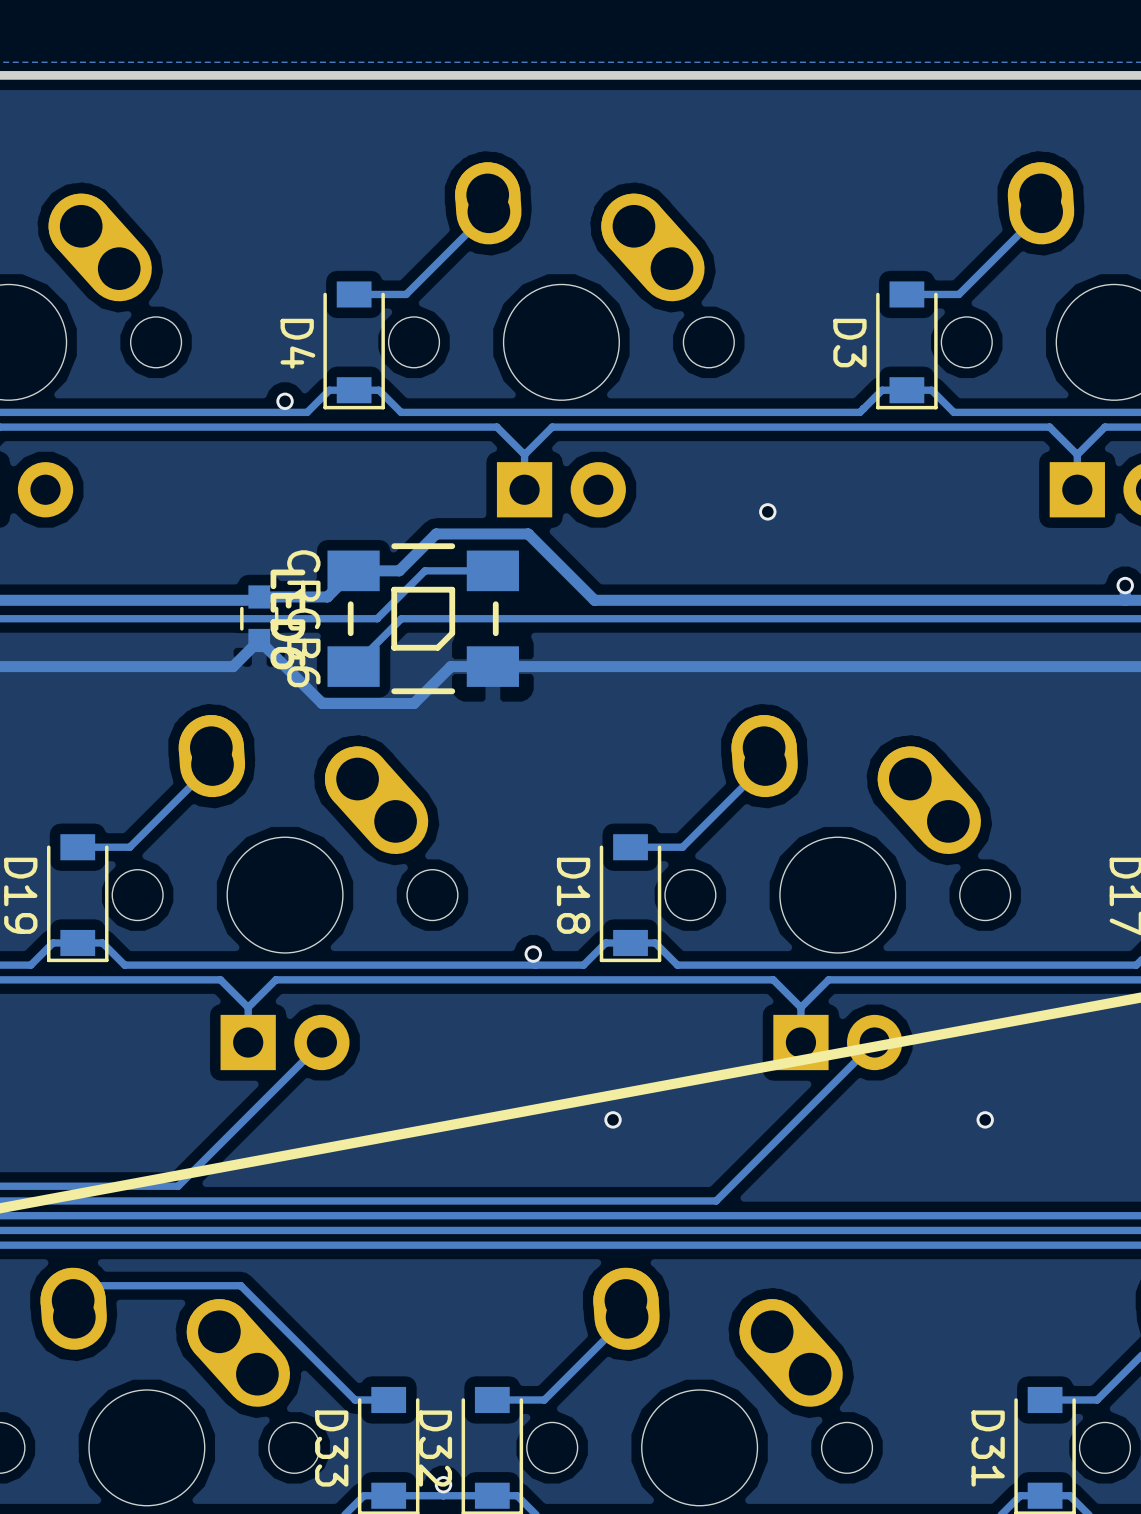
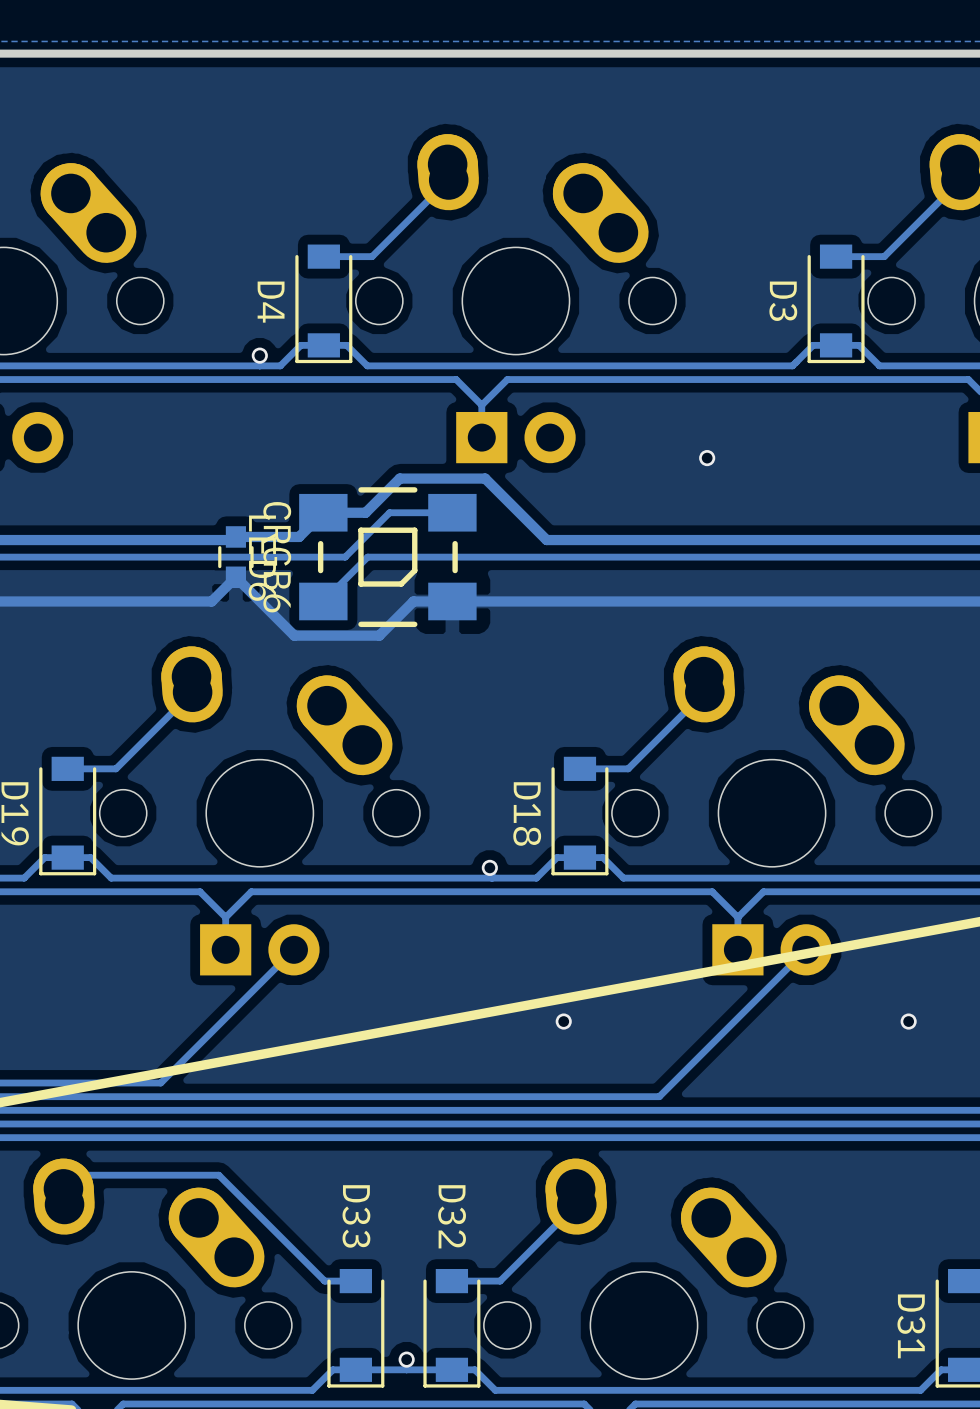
D33 name position: D33 (331, 1448) -> D33 (356, 1216)
D32 name position: D32 (435, 1448) -> D32 (452, 1216)

